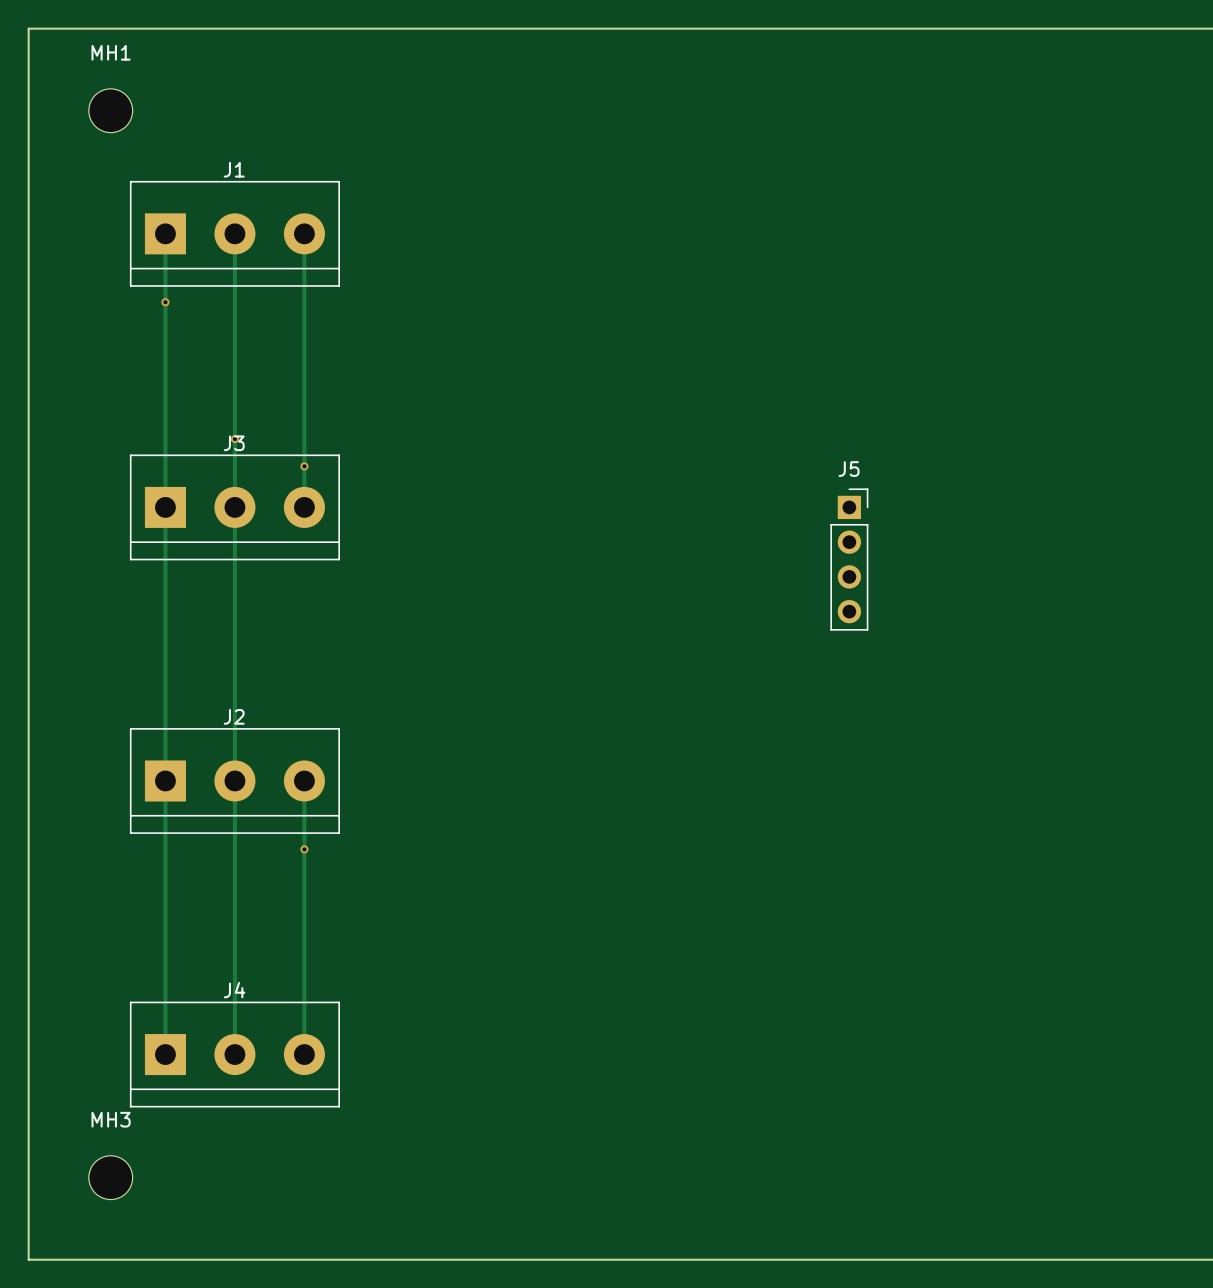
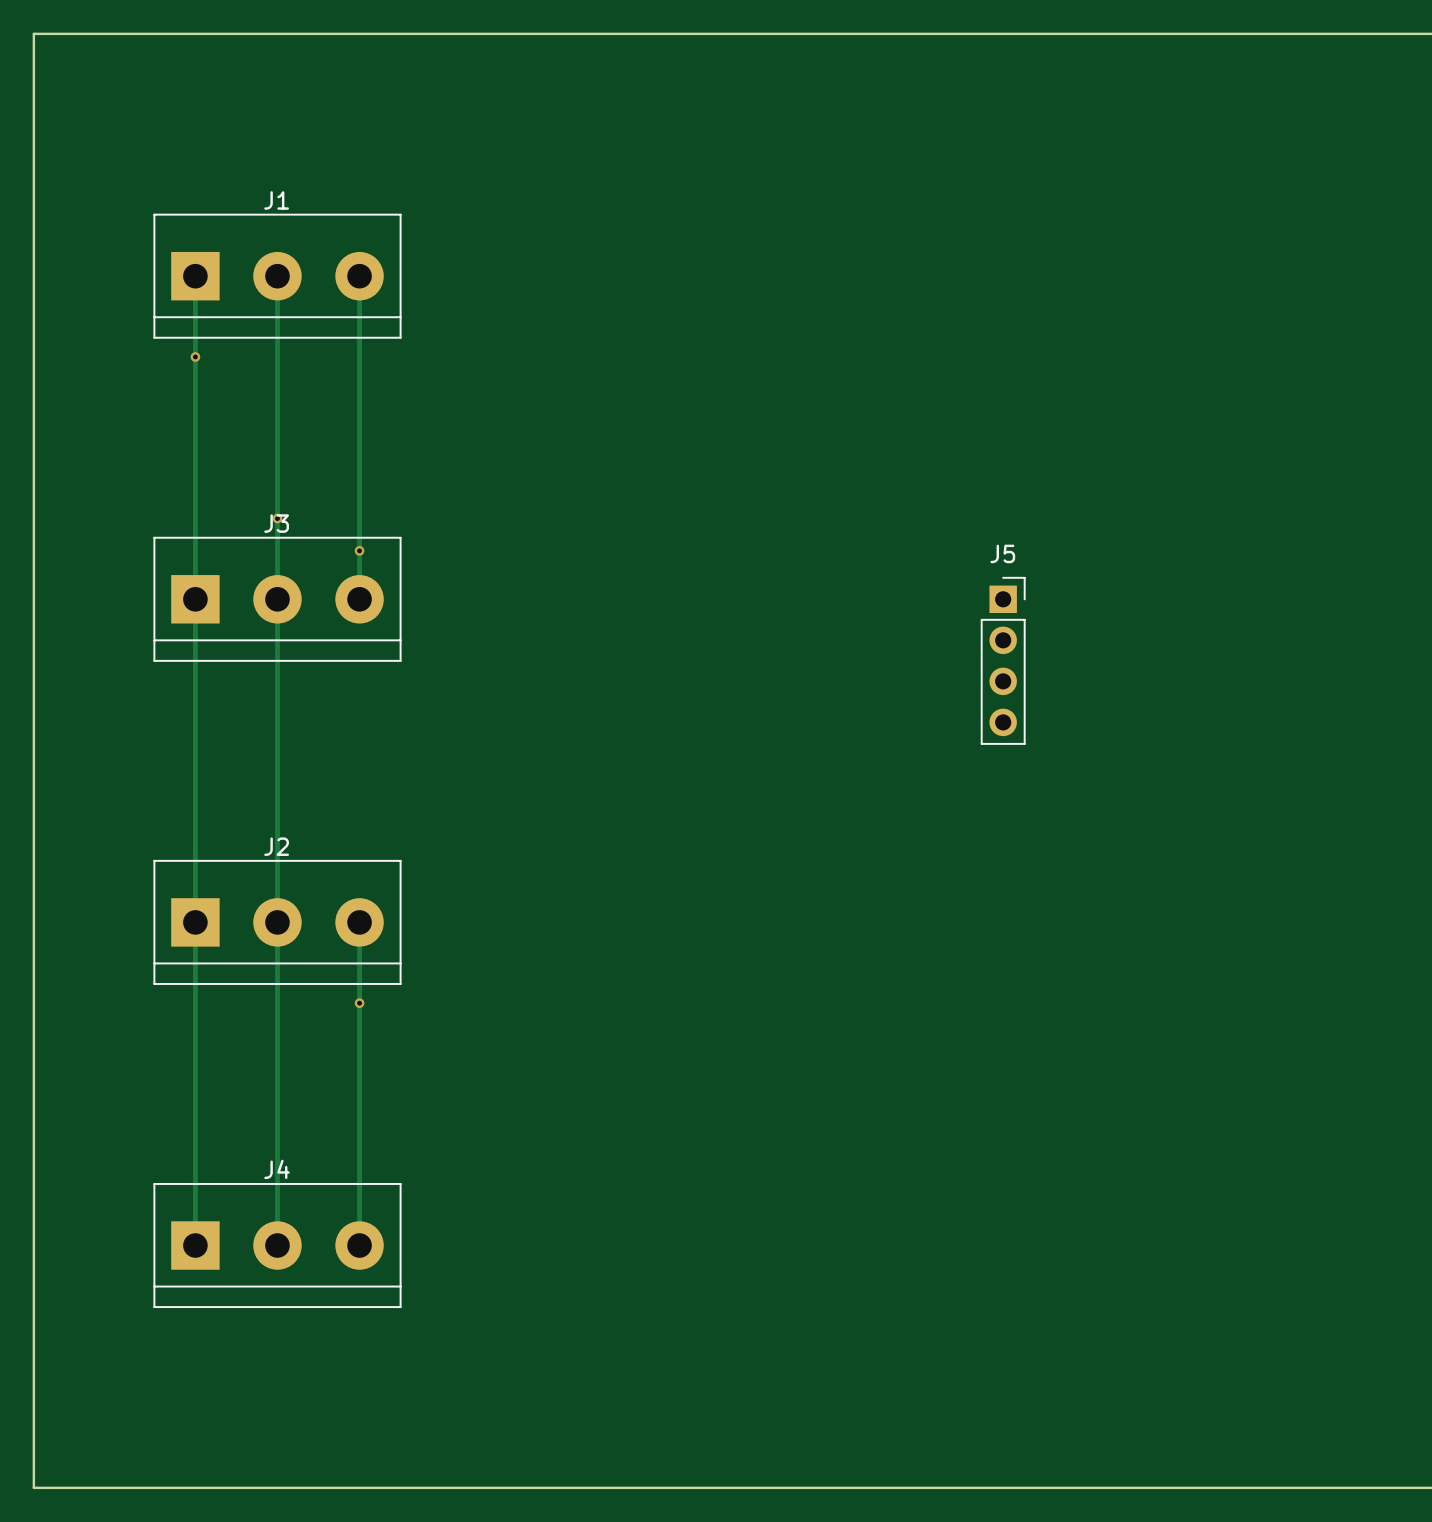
MH1: (110, 110) -> none
MH3: (110, 1177) -> none

